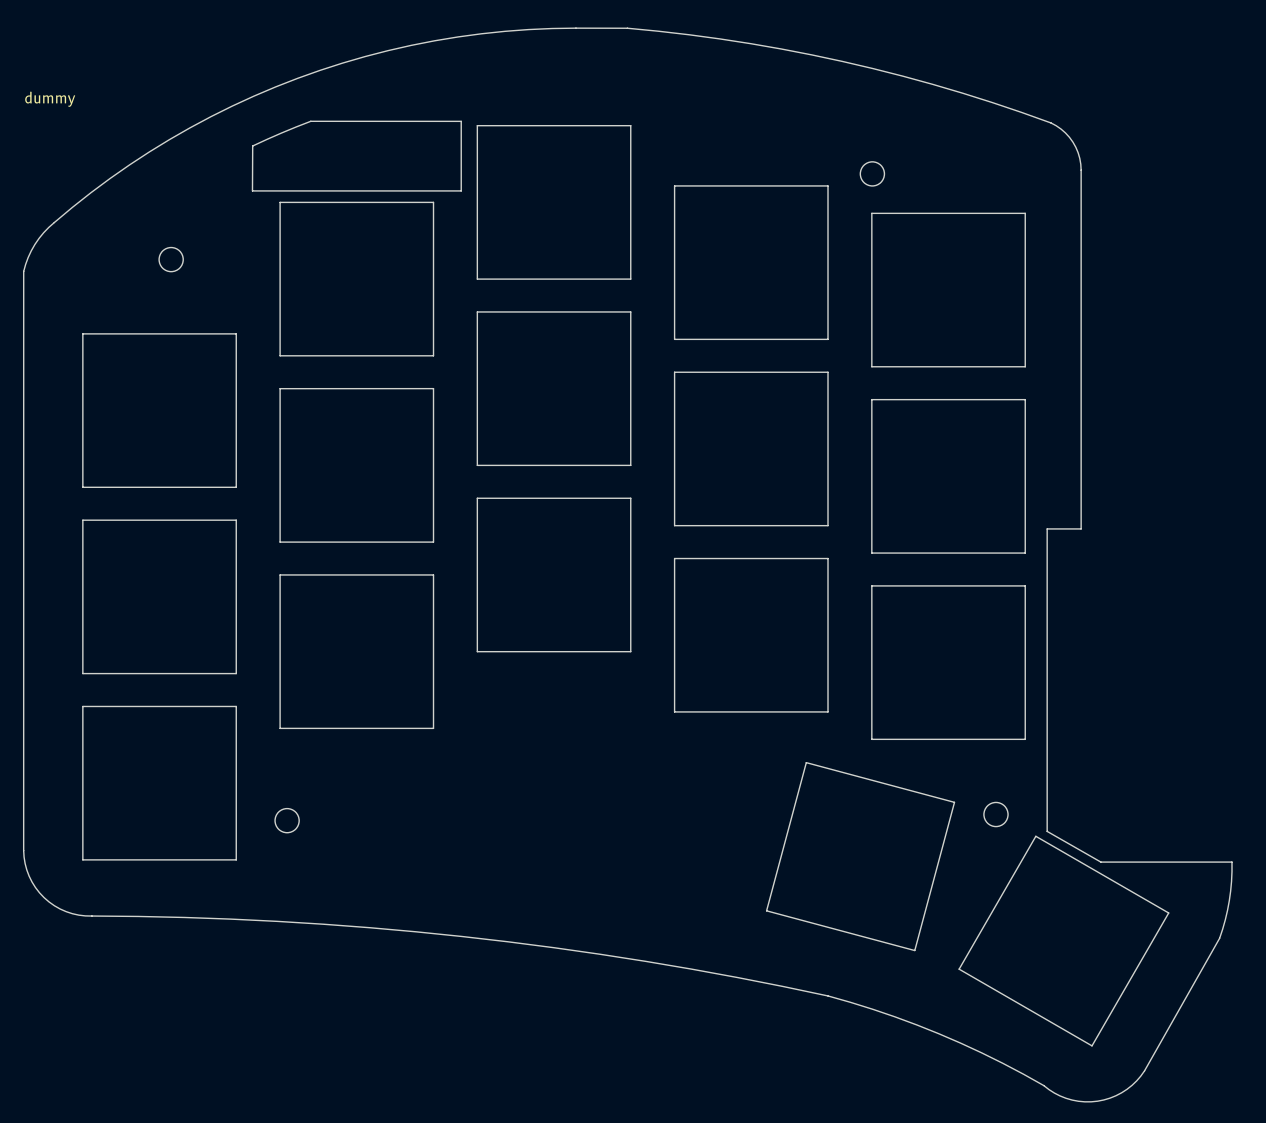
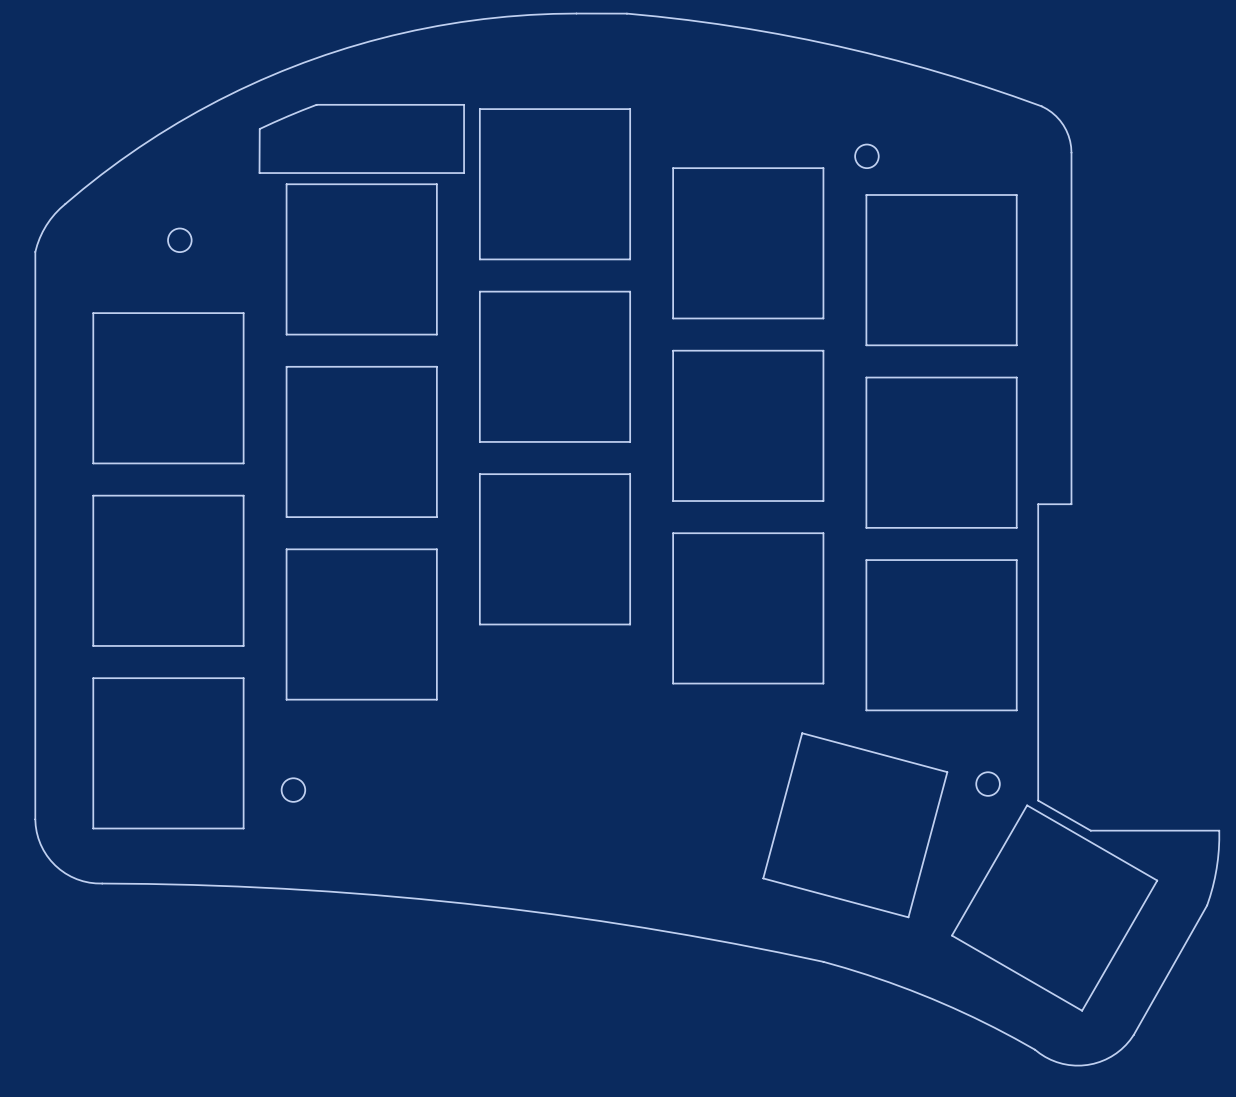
dummy: (50, 99) -> none

